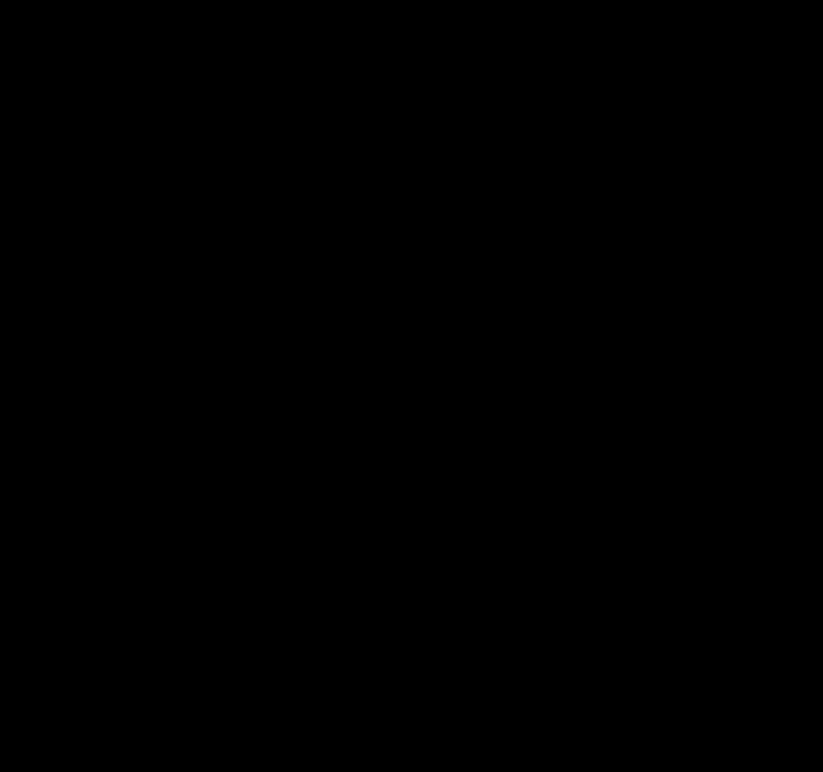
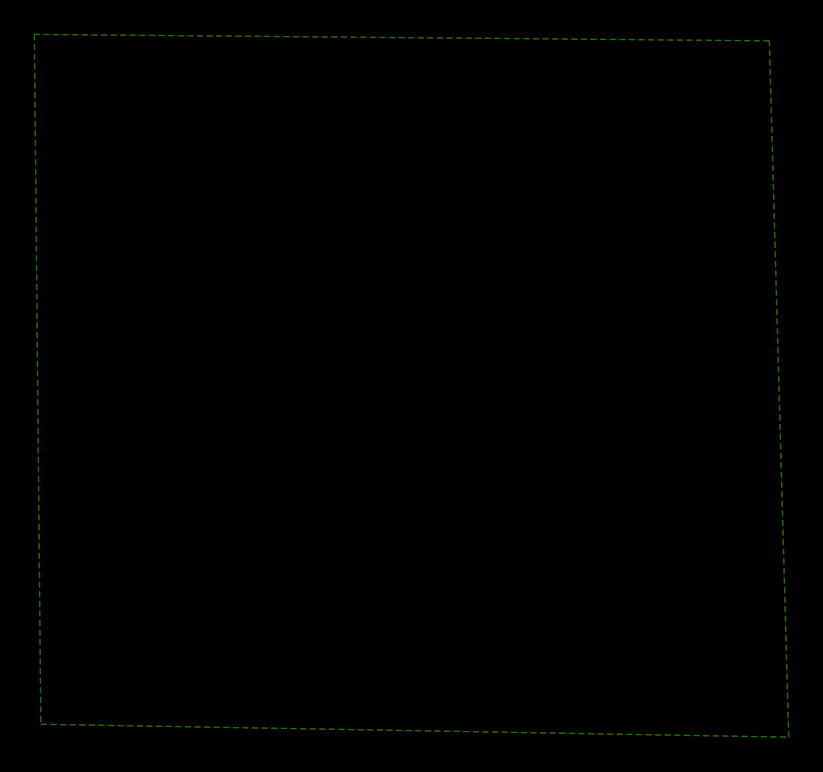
bottom zone outline: none -> (34, 34) (769, 40) (788, 737) (40, 724) (34, 34)

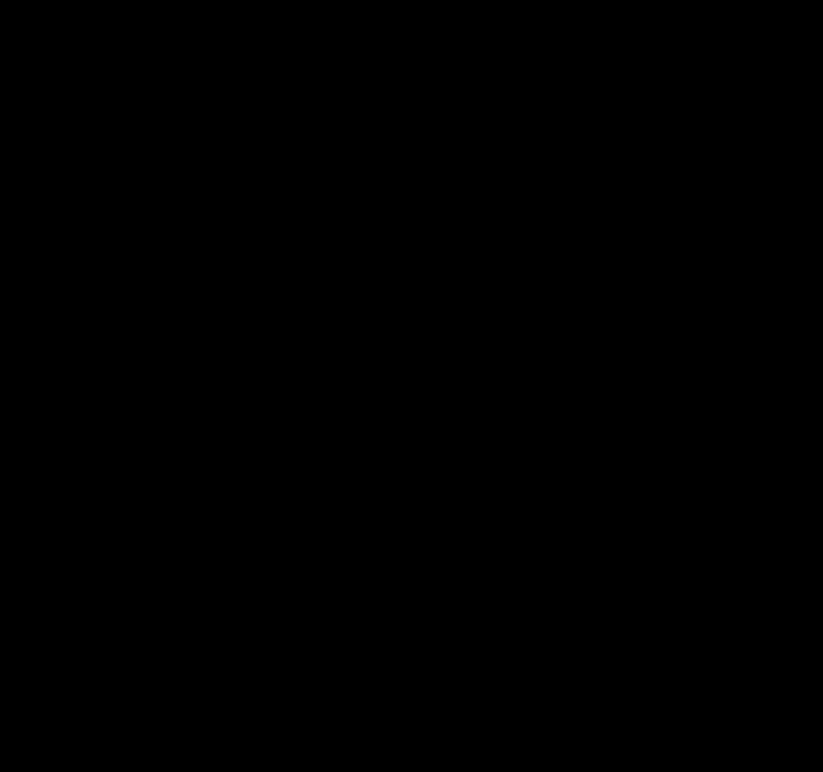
bottom zone outline: (34, 34) (769, 40) (788, 737) (40, 724) (34, 34) -> none

